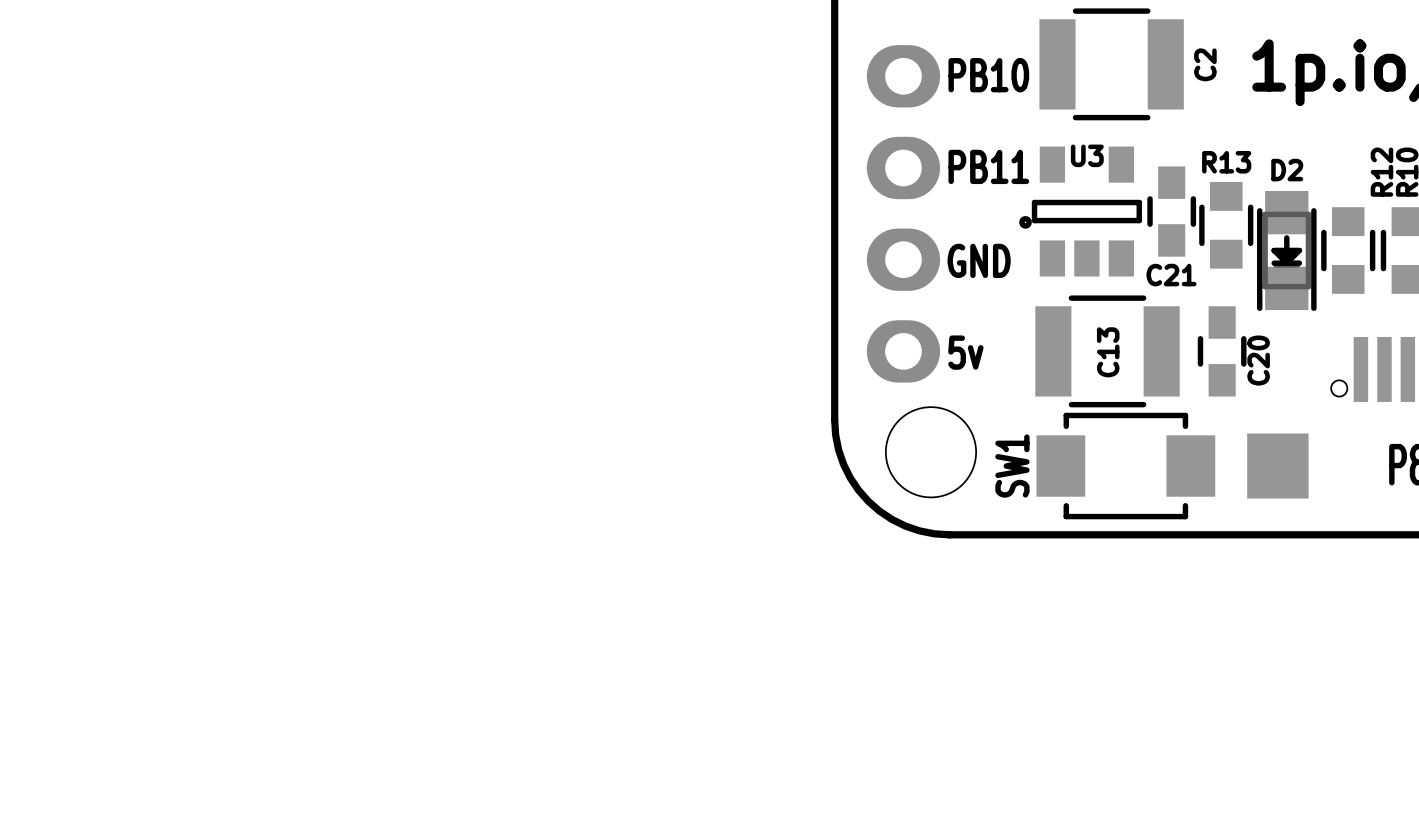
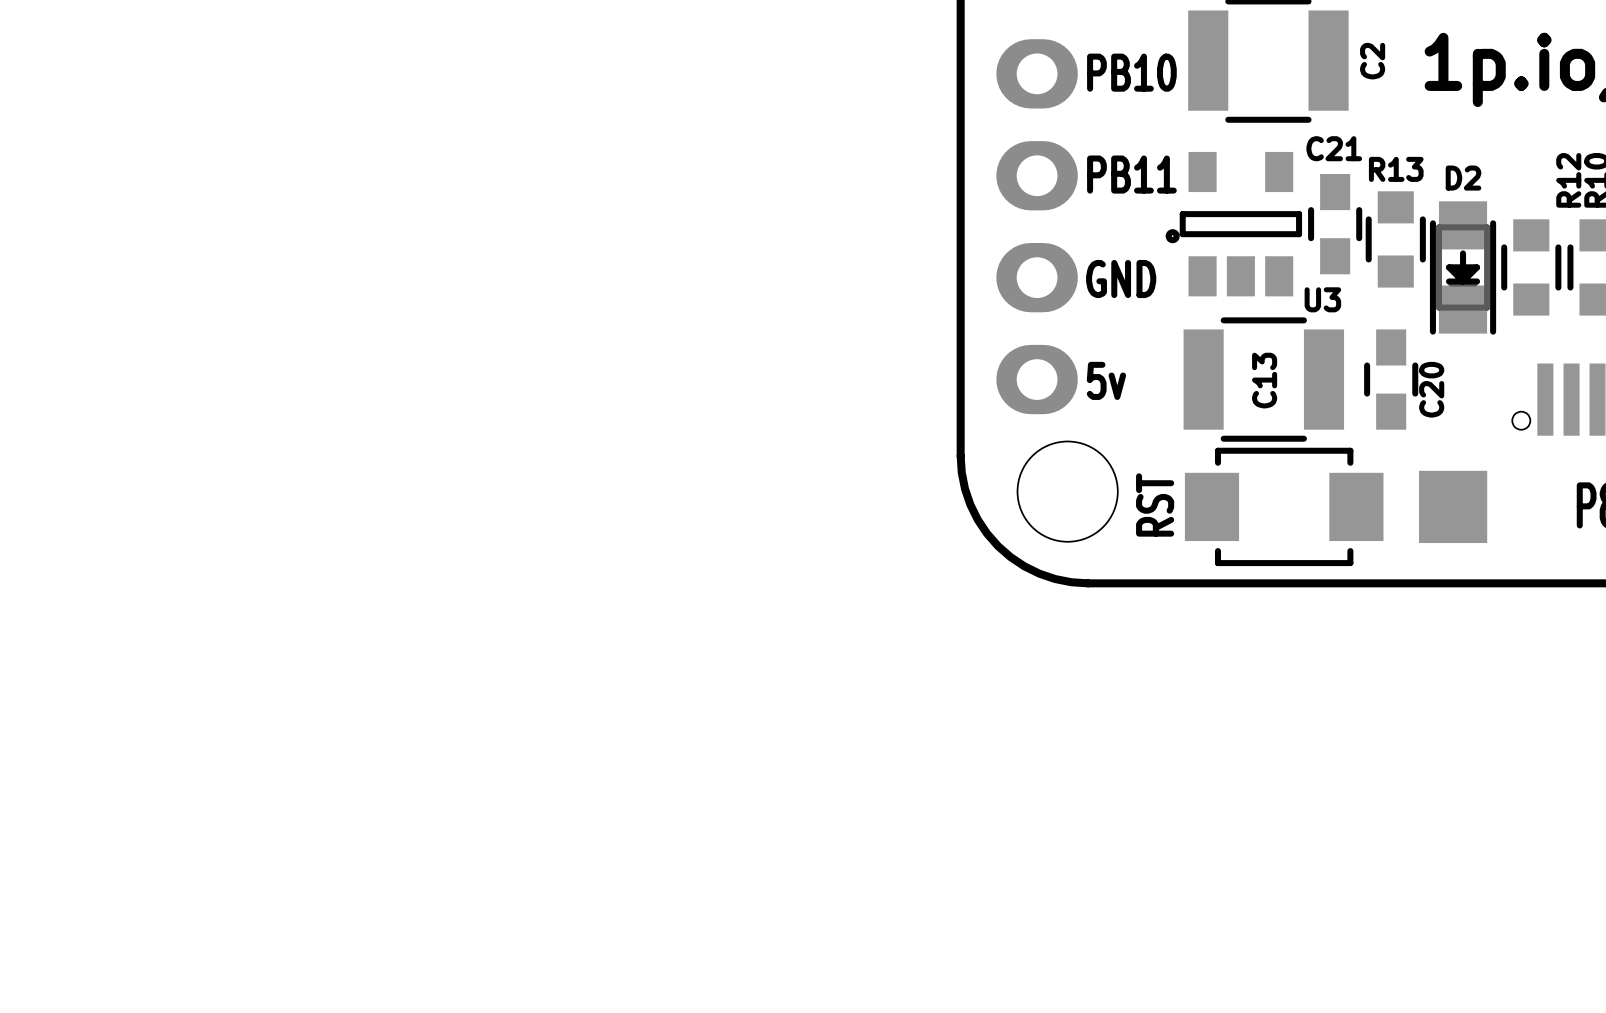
U3 name position: U3 (1087, 155) -> U3 (1322, 299)
C21 name position: C21 (1171, 275) -> C21 (1334, 148)
SW1 name: SW1 (1012, 466) -> RST (1155, 504)

